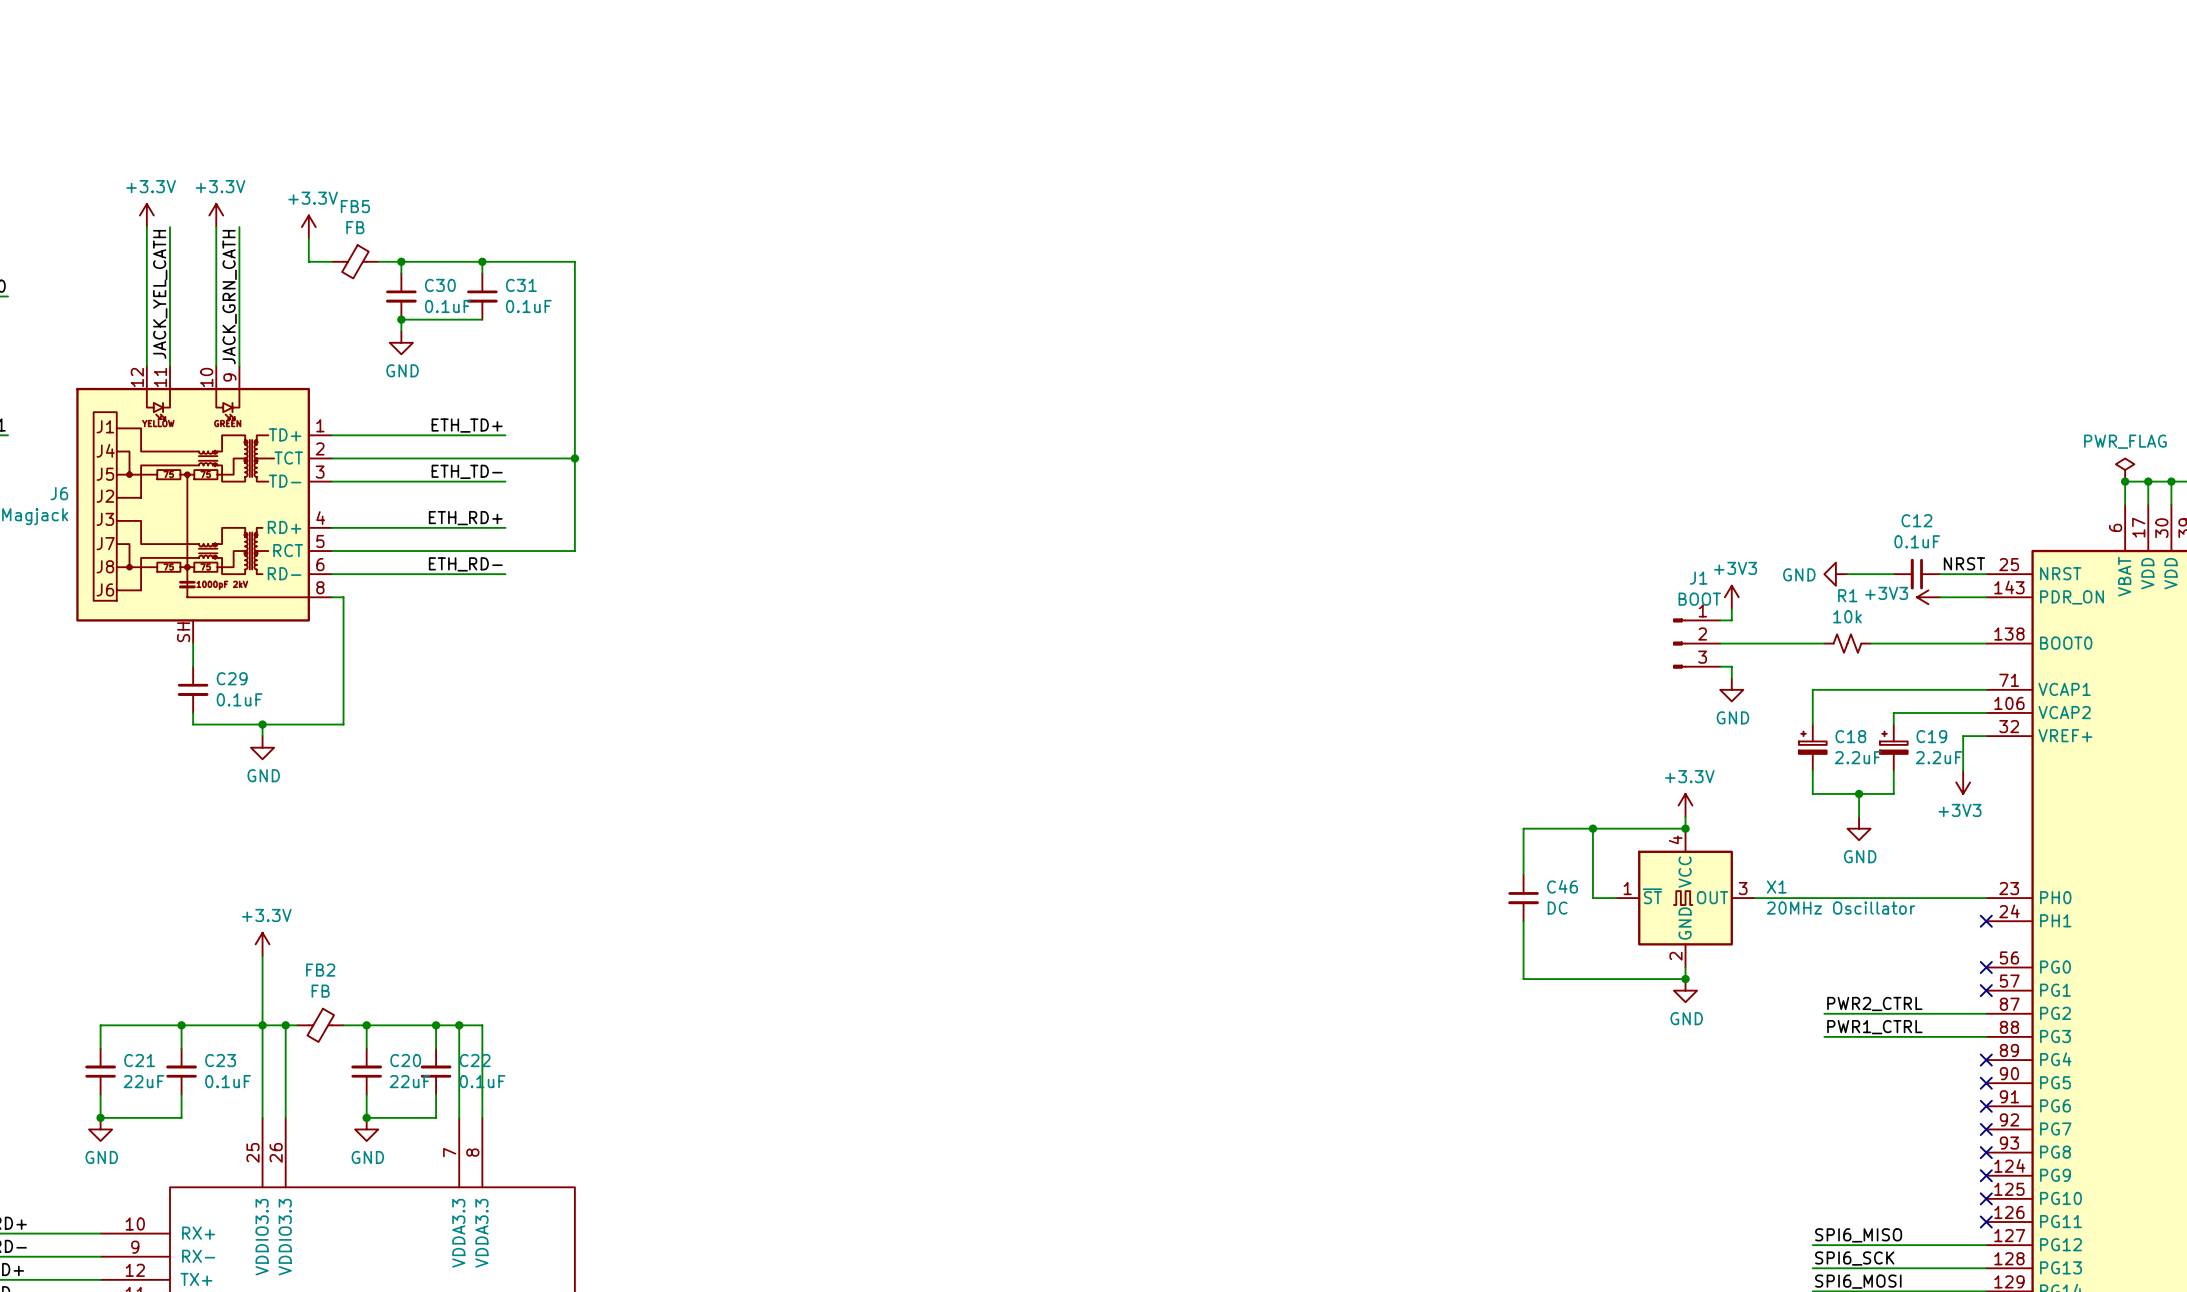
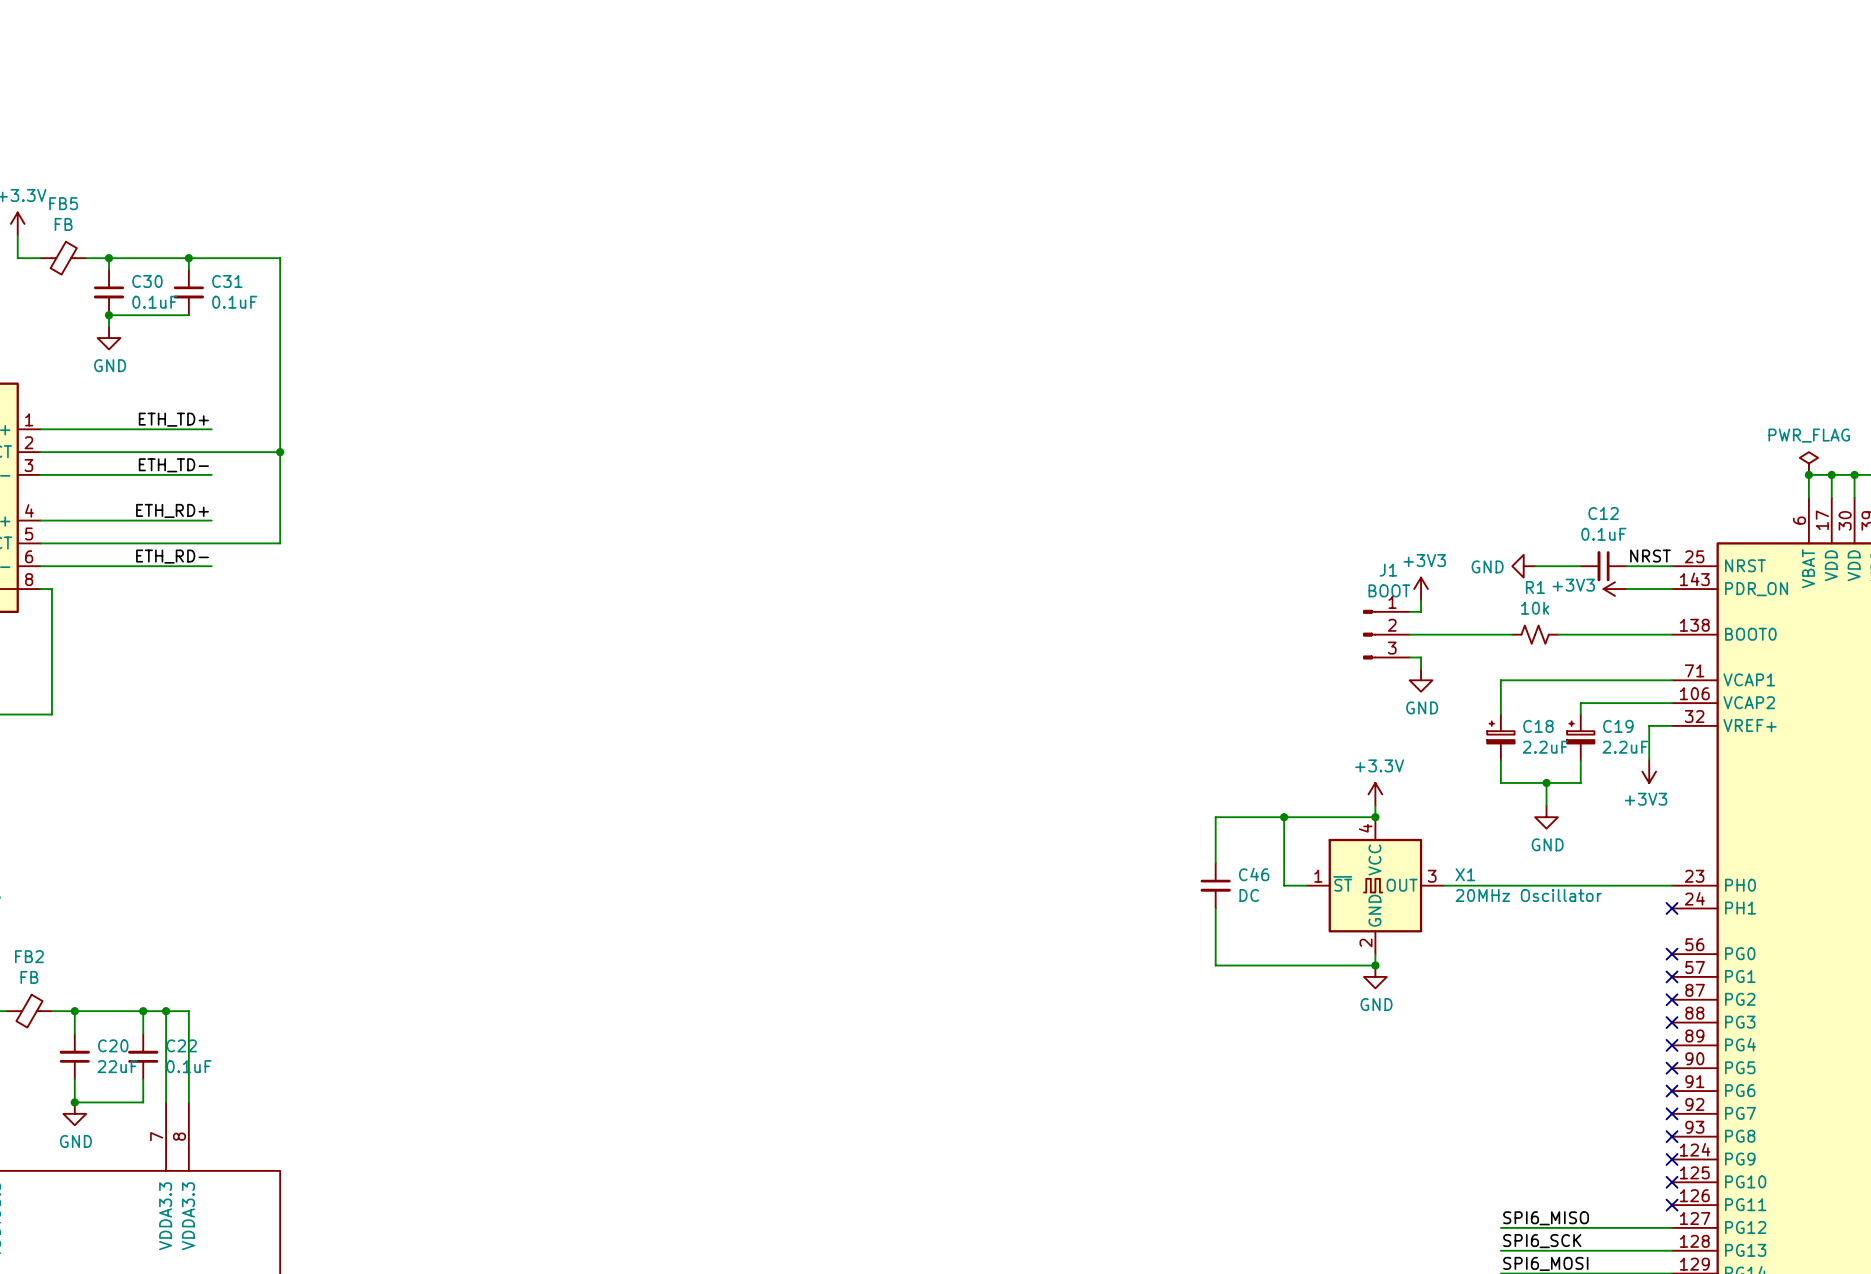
label: PWR2_CTRL (1874, 1004) -> none
wire: (1824, 1013) (1986, 1013) -> none
no-connect mark: none -> (1672, 999)
label: PWR1_CTRL (1874, 1027) -> none
wire: (1824, 1036) (1986, 1036) -> none
no-connect mark: none -> (1672, 1022)

